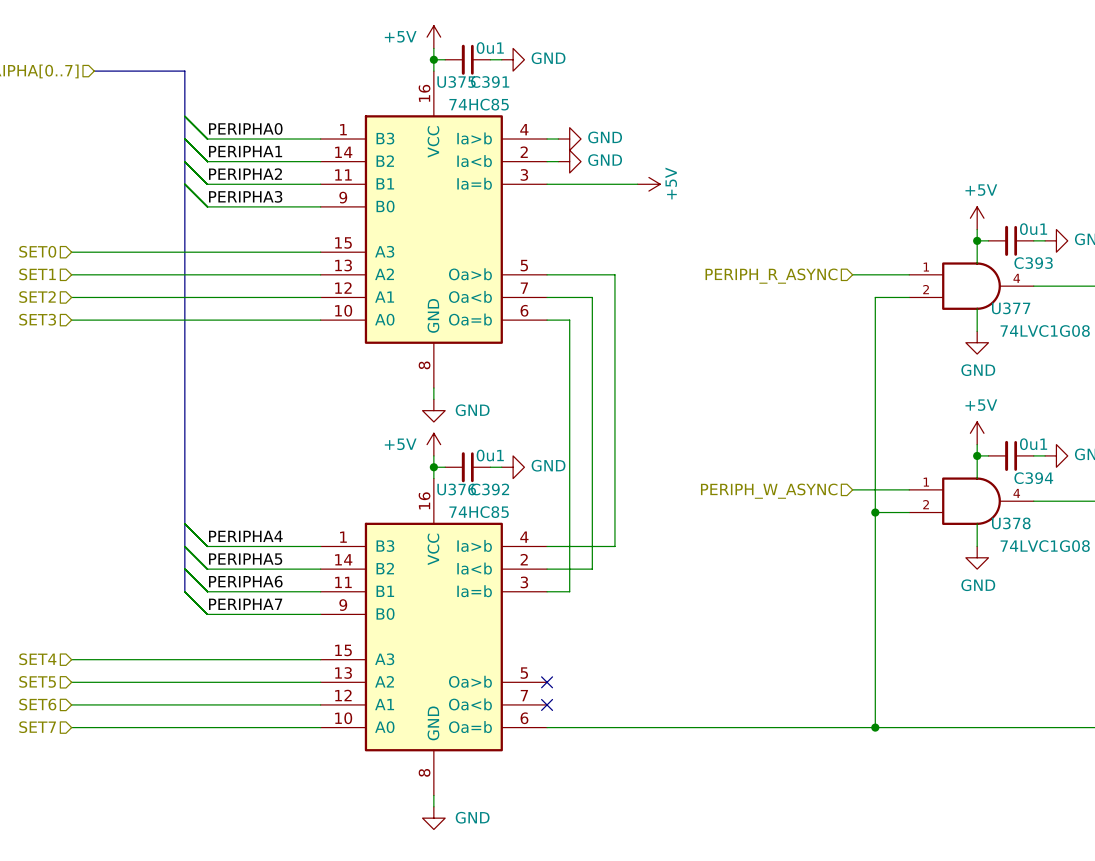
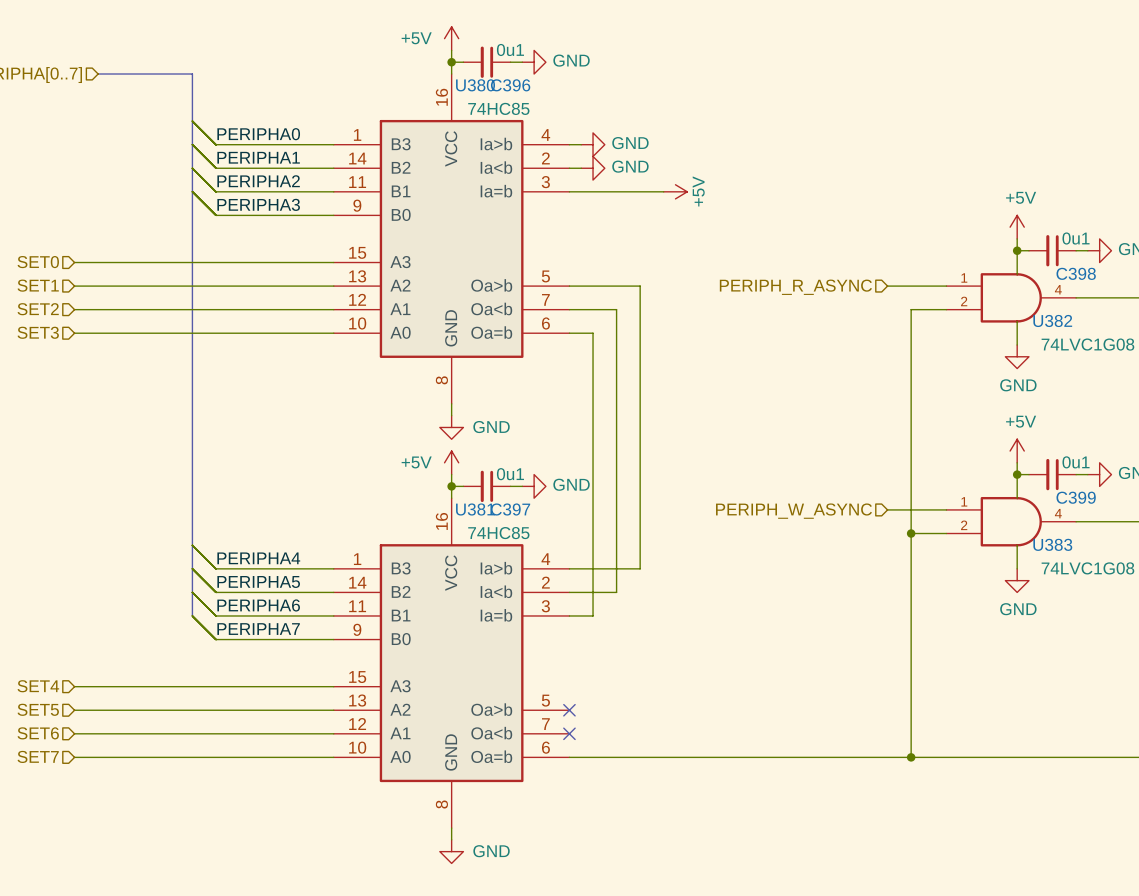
U375 name: U375 (456, 81) -> U380 (475, 85)
C391 name: C391 (490, 81) -> C396 (510, 85)
C393 name: C393 (1033, 263) -> C398 (1076, 273)
U377 name: U377 (1011, 308) -> U382 (1052, 320)
C394 name: C394 (1033, 478) -> C399 (1076, 497)
U376 name: U376 (456, 489) -> U381 (475, 509)
C392 name: C392 (490, 489) -> C397 (510, 509)
U378 name: U378 (1011, 523) -> U383 (1052, 544)

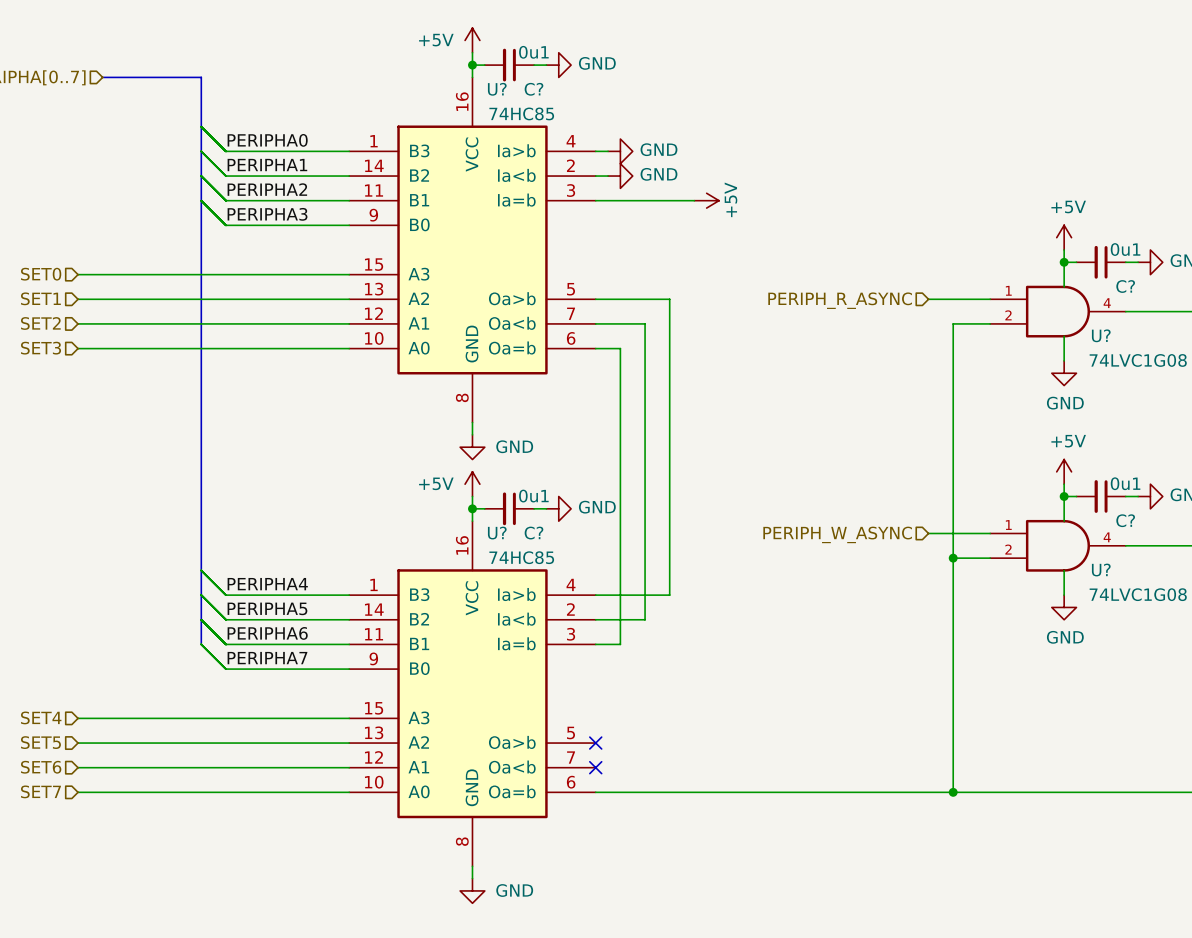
U380 name: U380 (475, 85) -> U? (497, 89)
C396 name: C396 (510, 85) -> C? (533, 89)
C398 name: C398 (1076, 273) -> C? (1125, 286)
U382 name: U382 (1052, 320) -> U? (1101, 335)
C399 name: C399 (1076, 497) -> C? (1125, 520)
U381 name: U381 (475, 509) -> U? (497, 533)
C397 name: C397 (510, 509) -> C? (533, 533)
U383 name: U383 (1052, 544) -> U? (1101, 570)

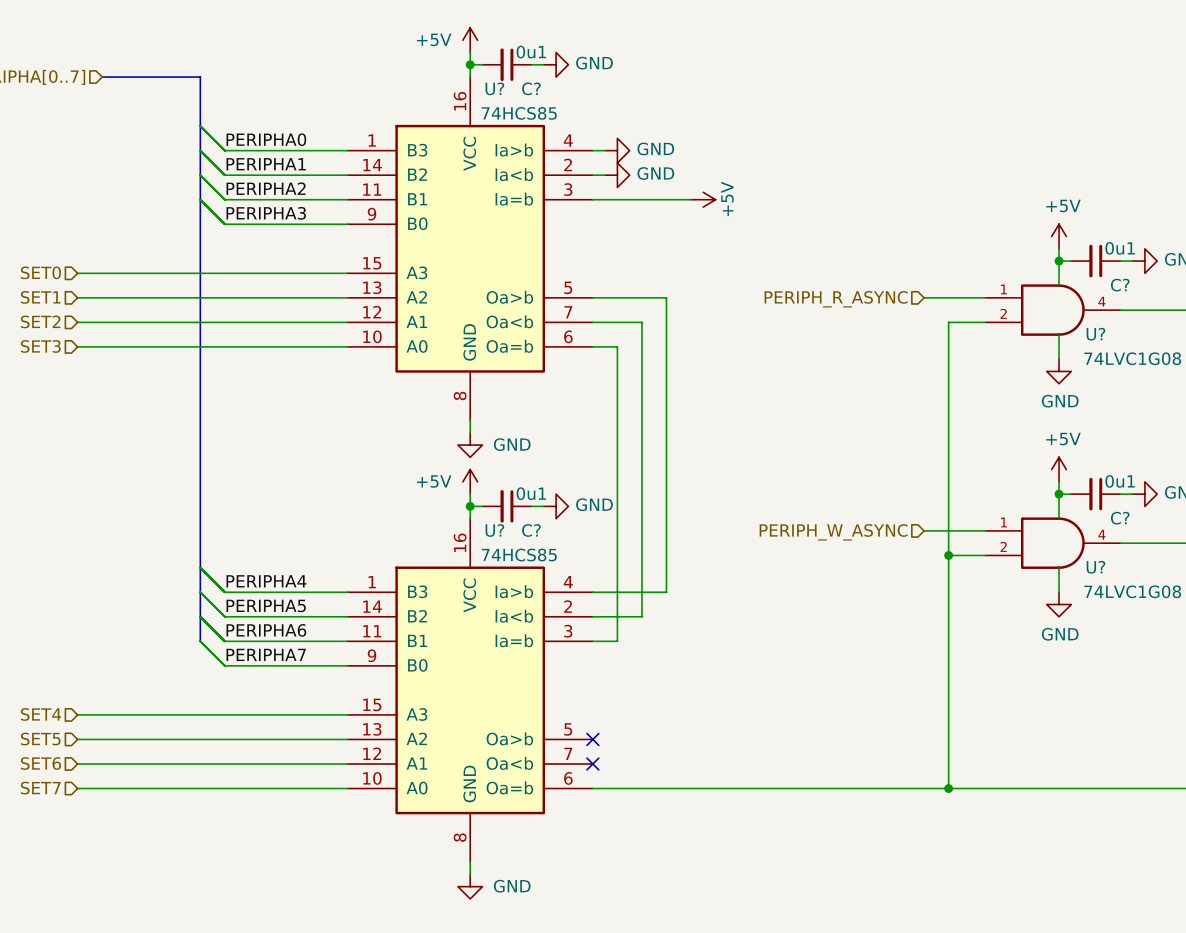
U? value: 74HC85 (521, 113) -> 74HCS85 (519, 113)
U? value: 74HC85 (521, 557) -> 74HCS85 (519, 555)

